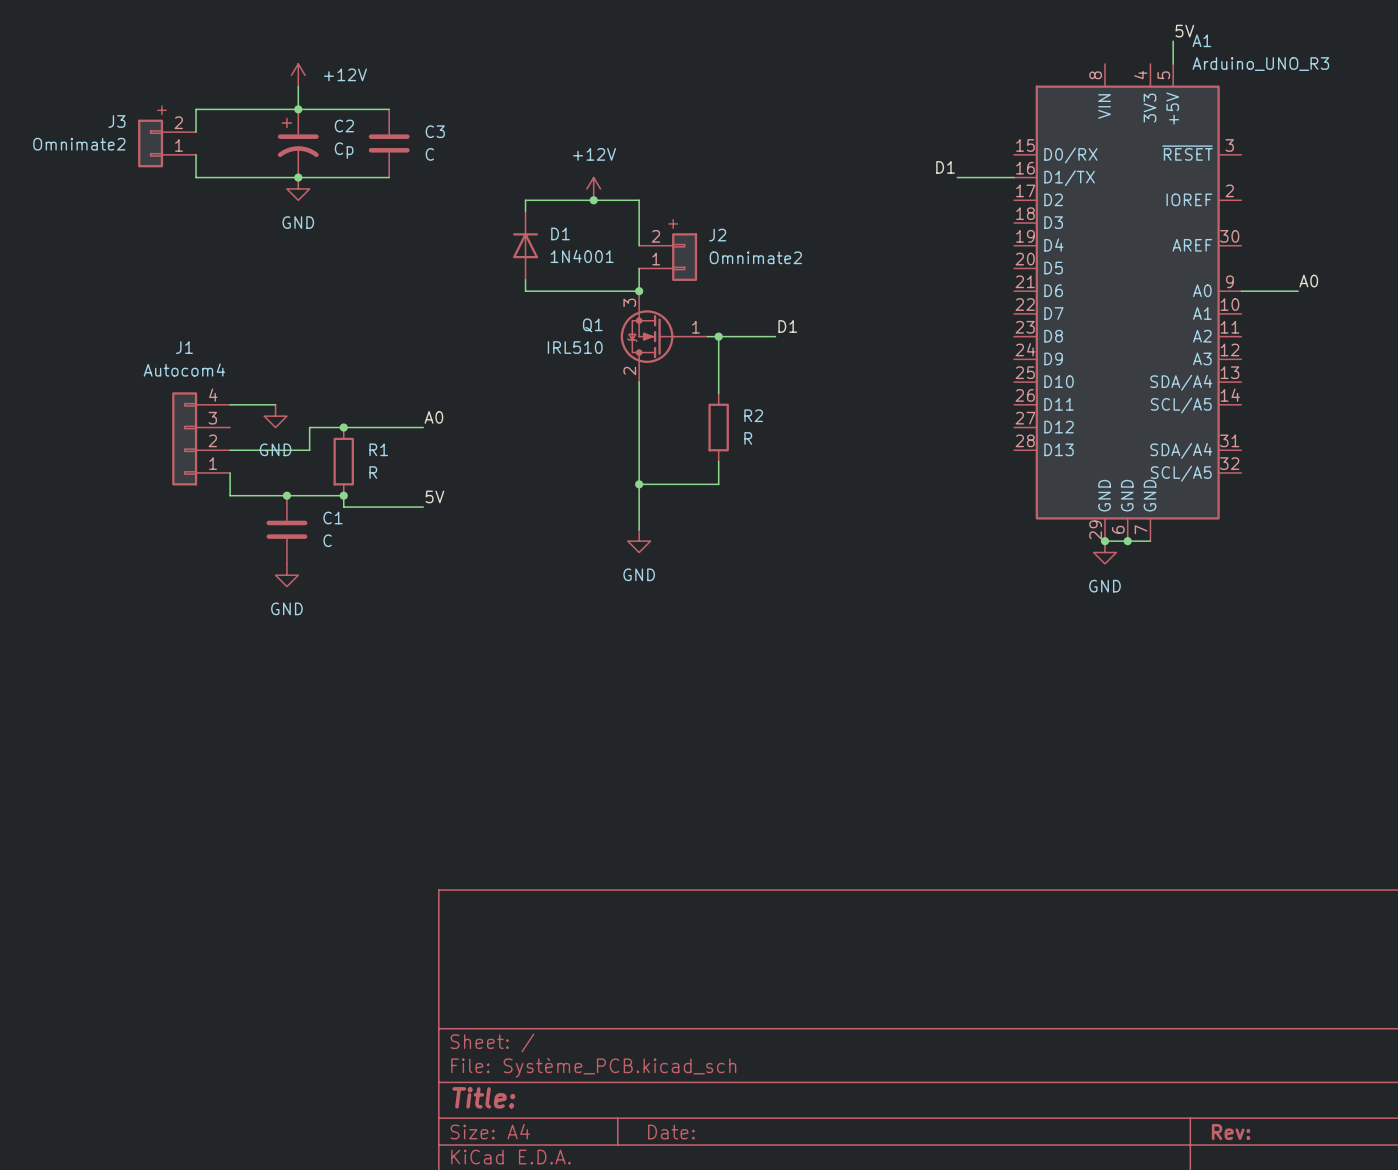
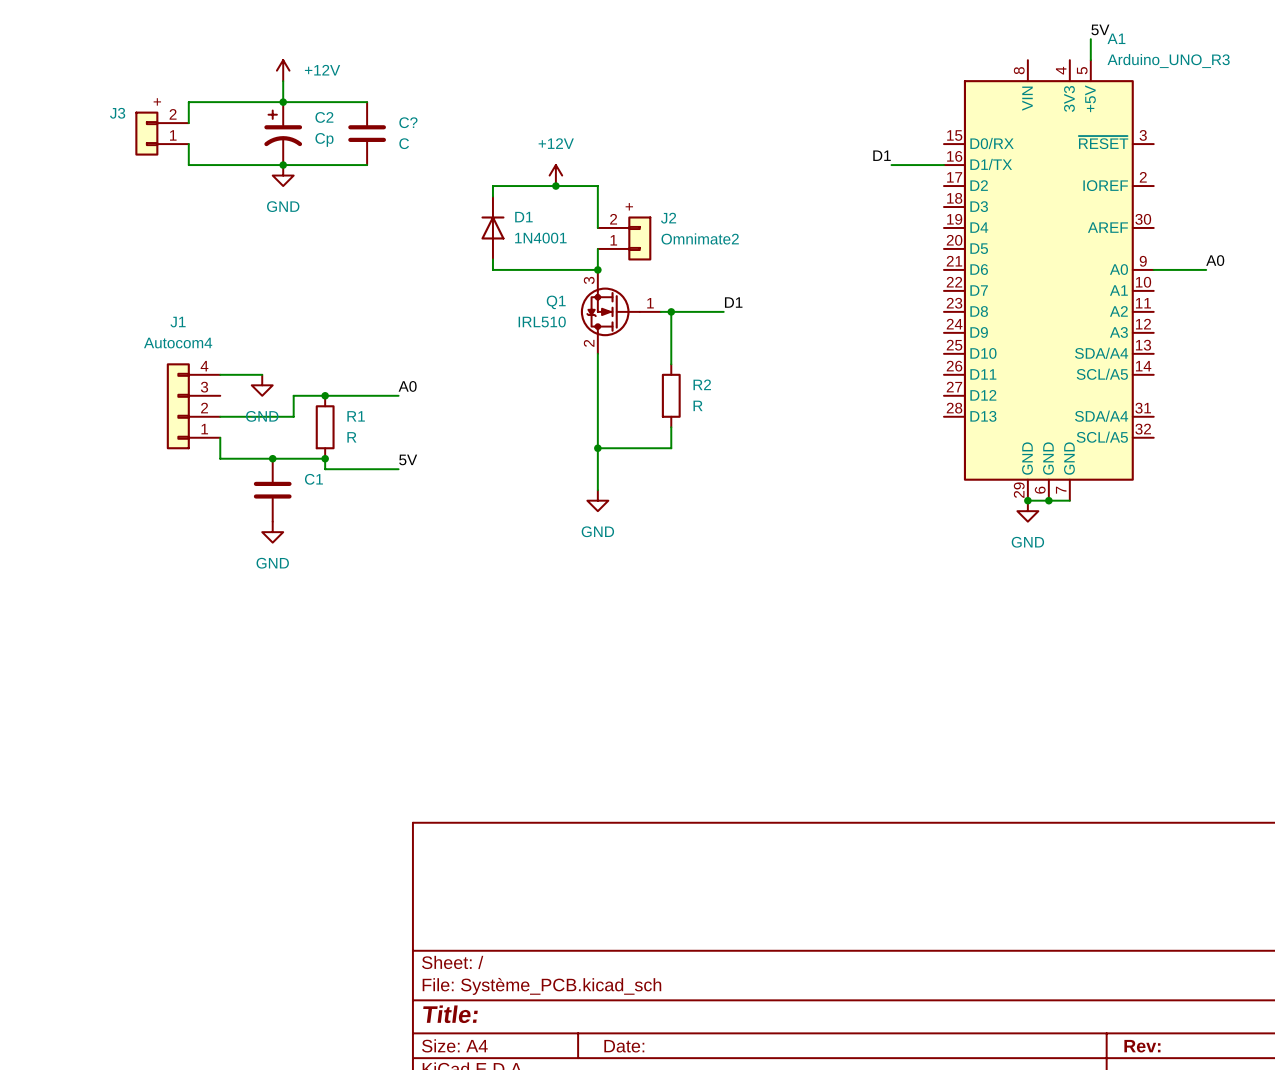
C3 name: C3 (435, 131) -> C? (408, 122)
J3 value: Omnimate2 (79, 144) -> none
C1 value: C (327, 540) -> none

